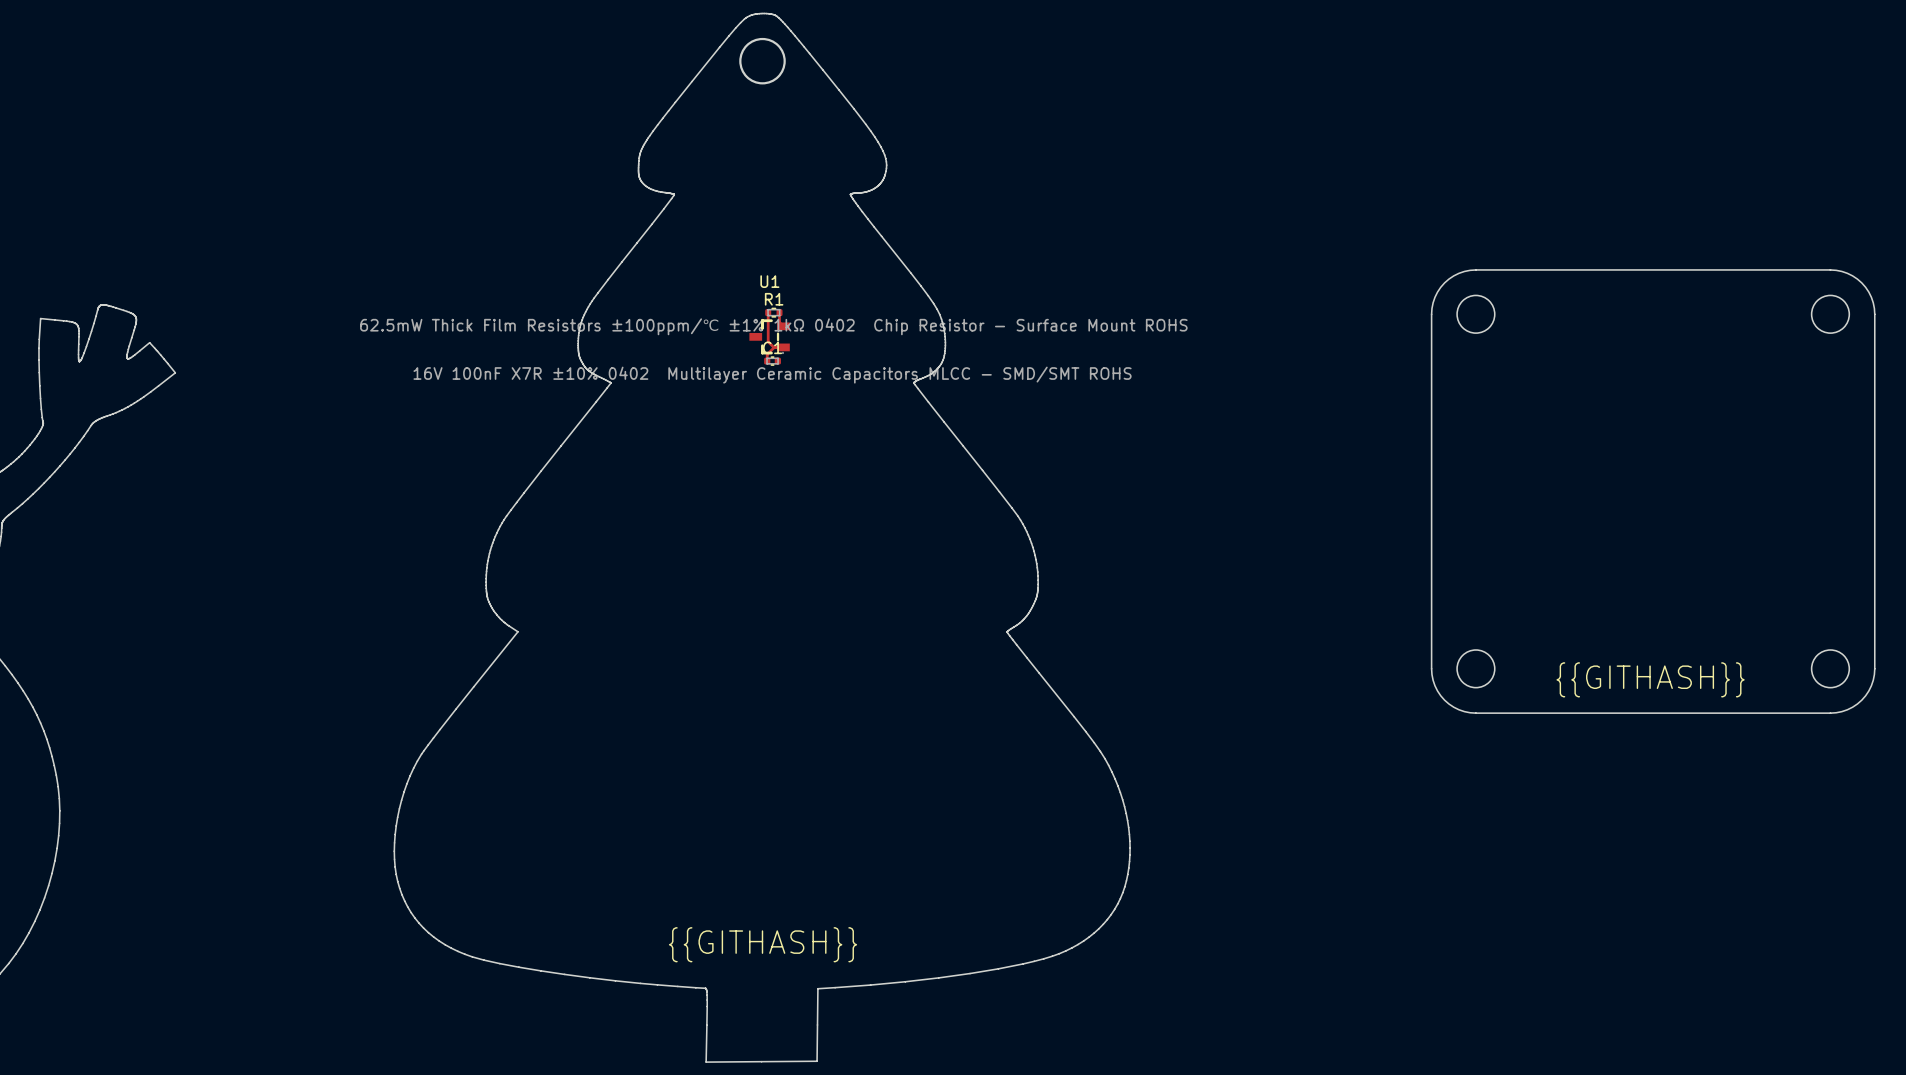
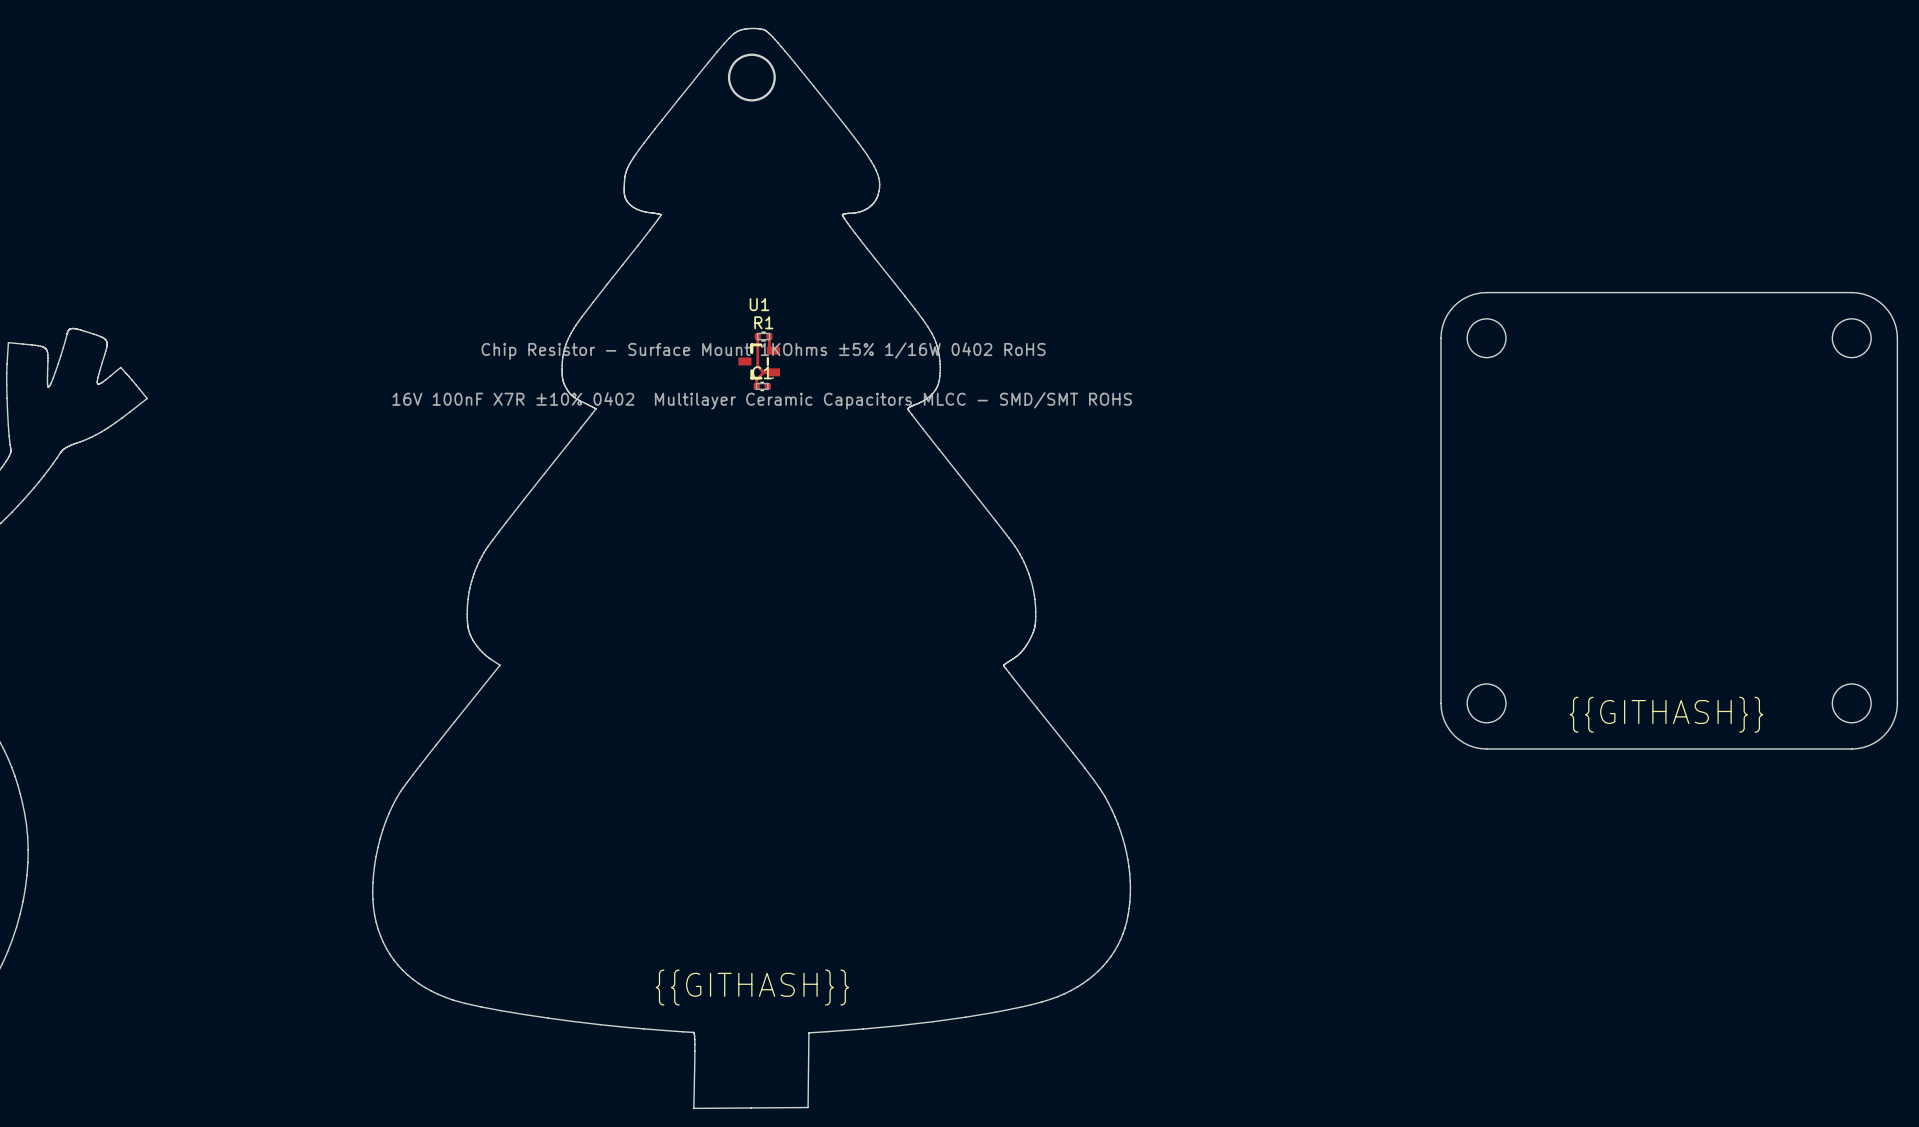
R1 value: 62.5mW Thick Film Resistors ±100ppm/℃ ±1% 1kΩ 0402 Chip Resistor - Surface Mount ROHS (773, 326) -> Chip Resistor - Surface Mount 1KOhms ±5% 1/16W 0402 RoHS (763, 351)

